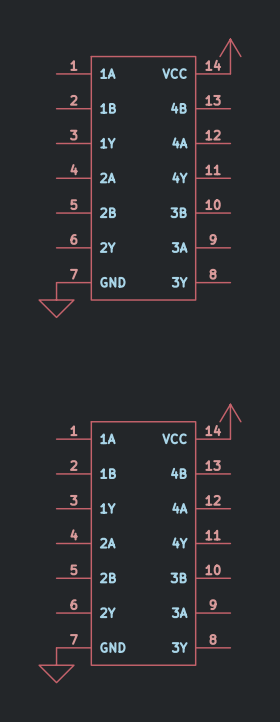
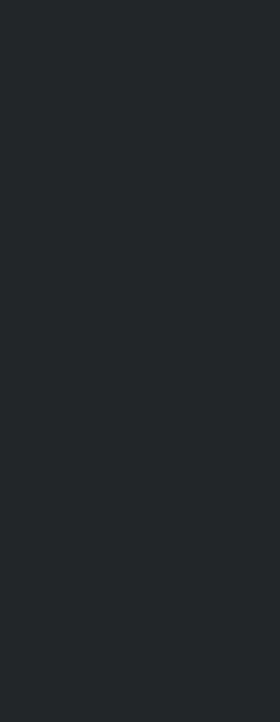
power symbol: (230, 56) -> none
part: (143, 178) -> none
power symbol: (56, 300) -> none
power symbol: (230, 421) -> none
part: (143, 543) -> none
power symbol: (56, 665) -> none

